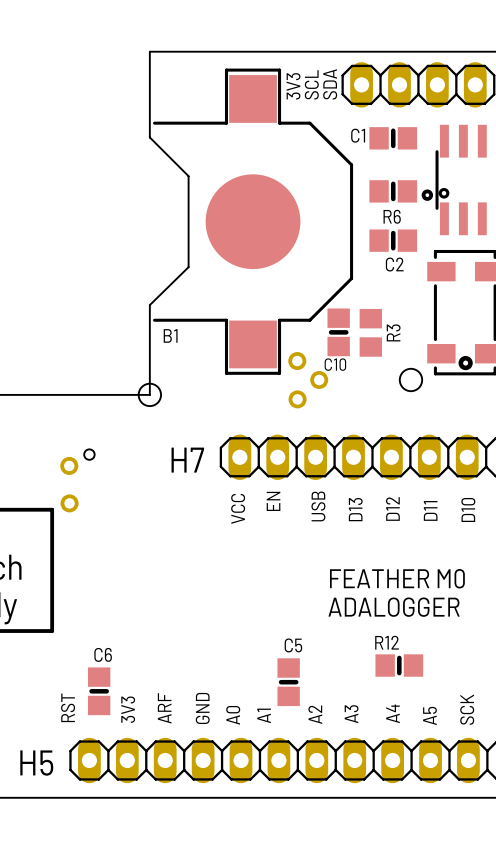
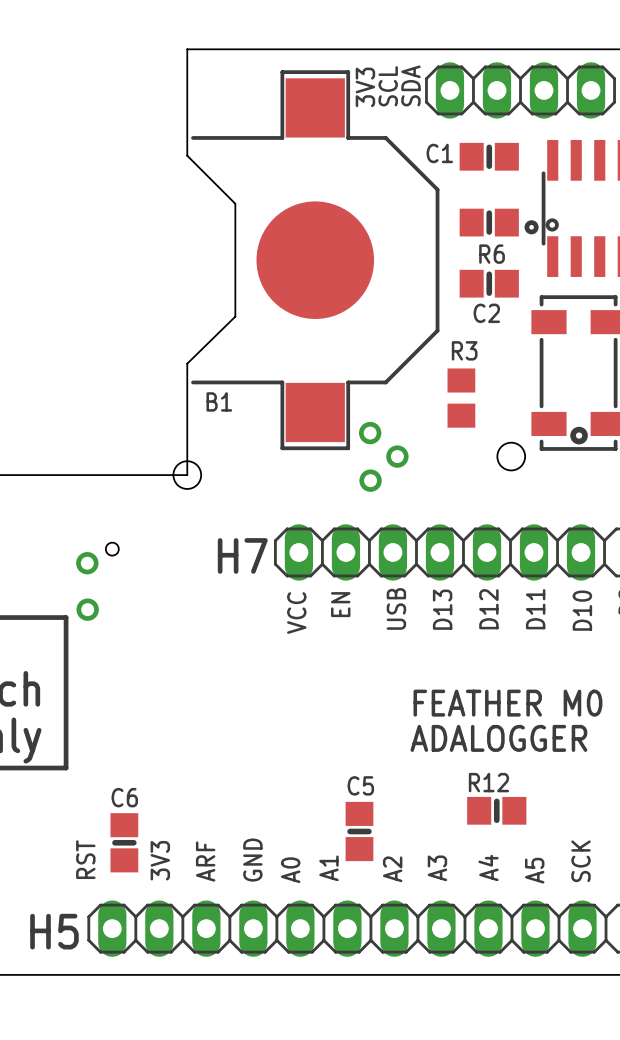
C10: (338, 332) -> none
R3 name rotation: 0° (393, 332) -> 90° clockwise (464, 350)
R3 name position: R3 (393, 332) -> R3 (464, 350)

